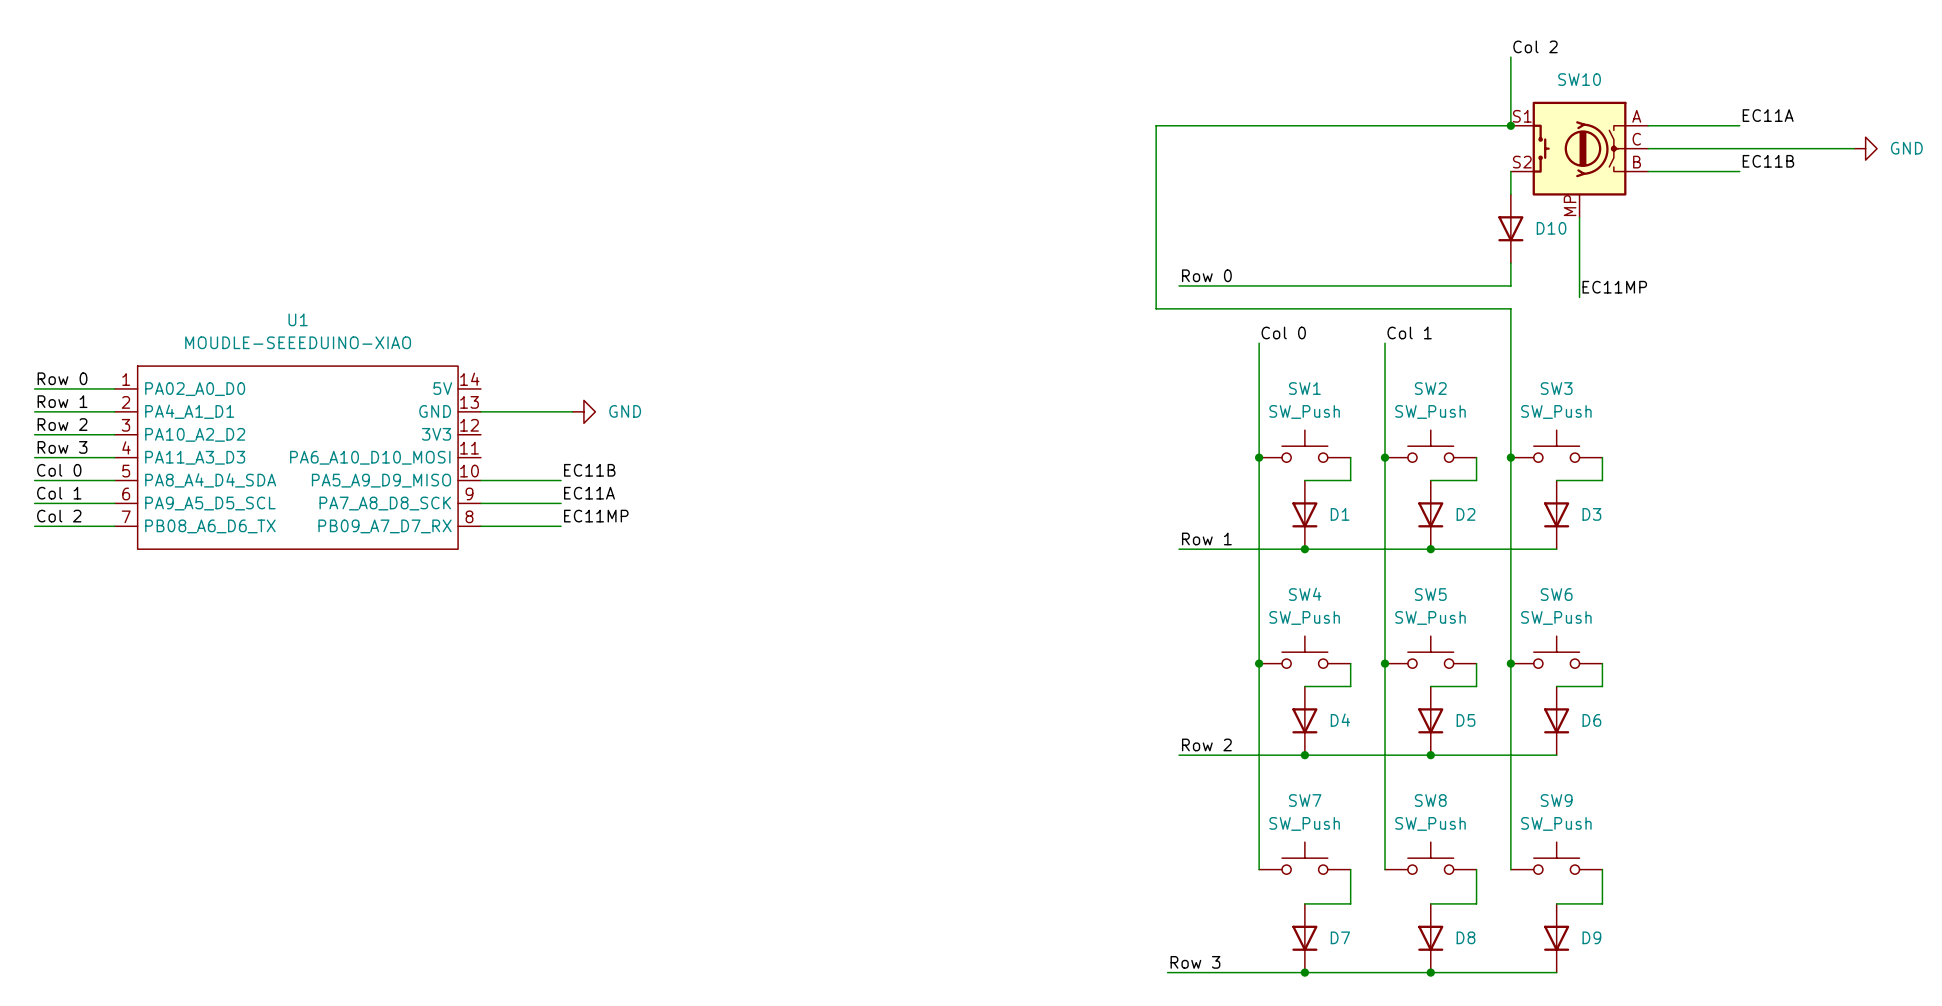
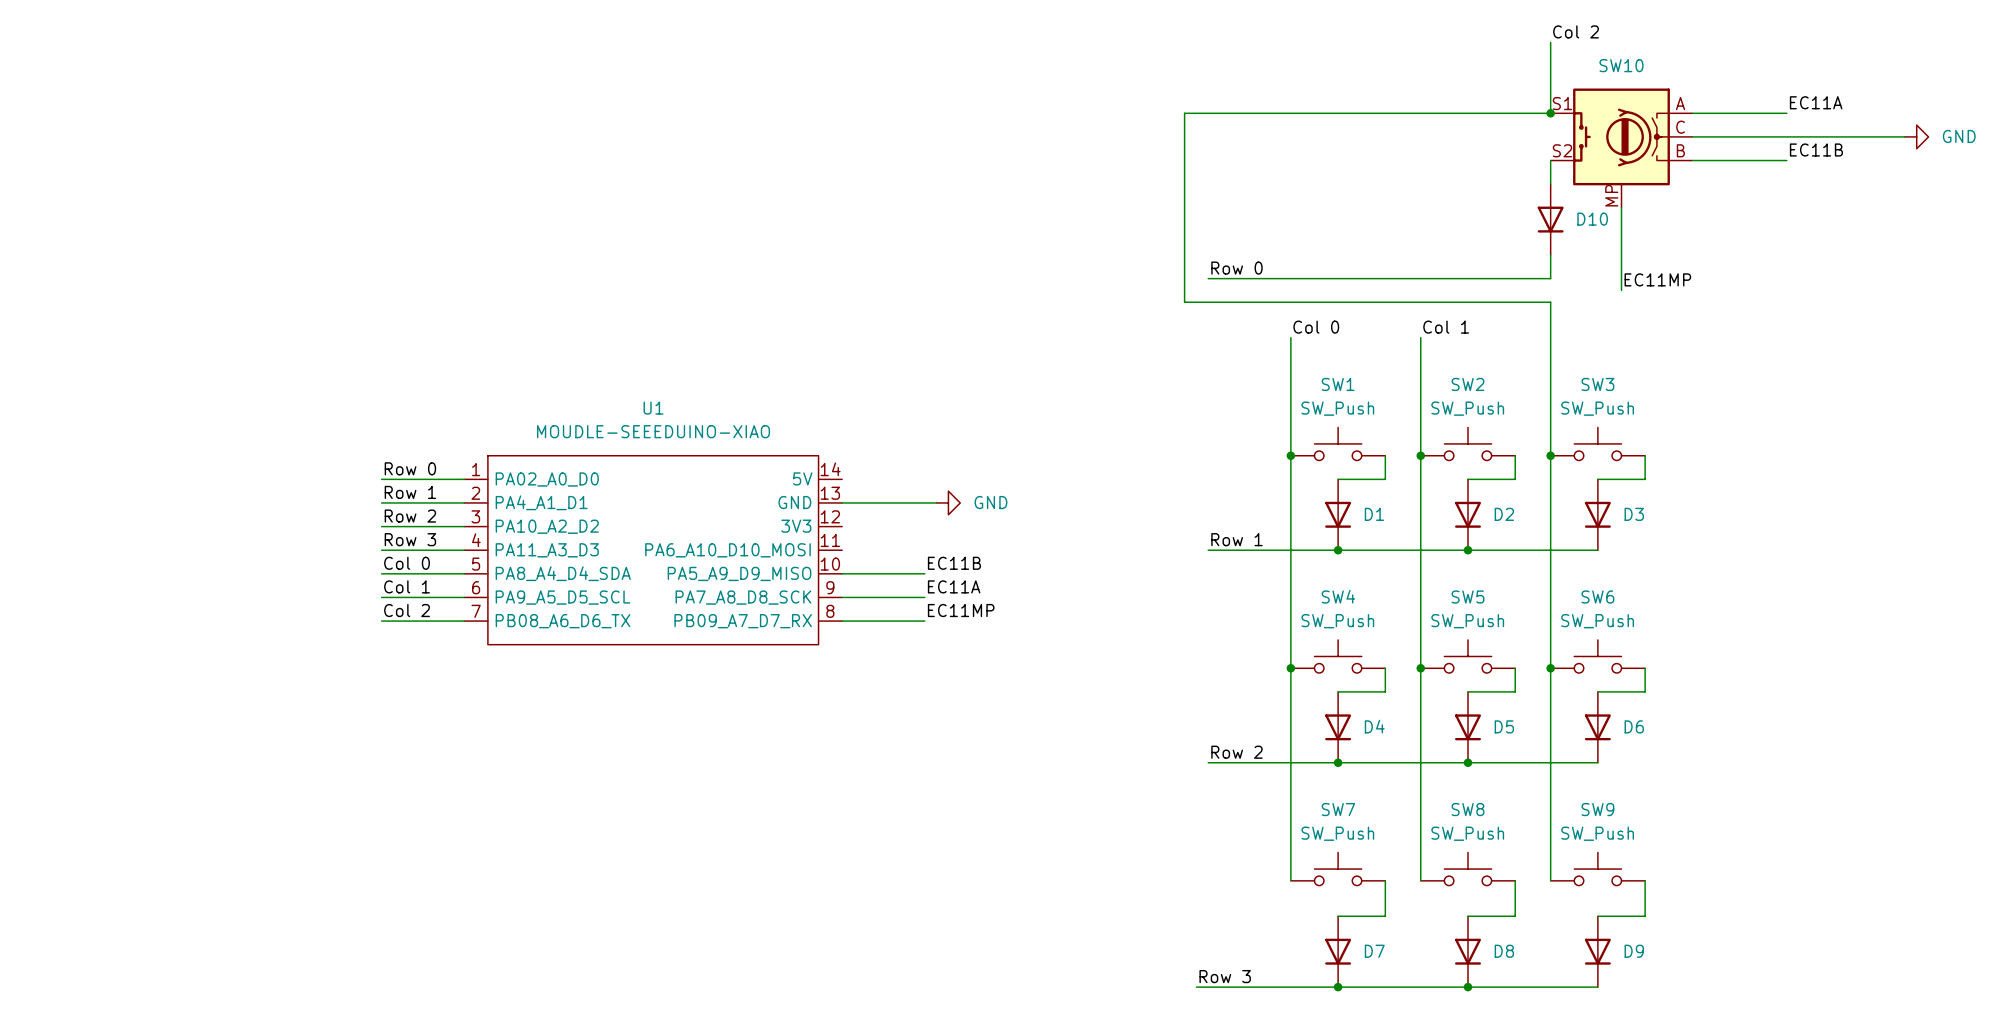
label: Row 0 (62, 378) -> none
wire: (34, 388) (114, 388) -> none
label: Row 1 (62, 401) -> none
wire: (34, 411) (114, 411) -> none
wire: (480, 411) (572, 411) -> none
power symbol: GND (583, 411) -> none
label: Row 2 (62, 424) -> none
wire: (34, 434) (114, 434) -> none
label: Row 3 (62, 447) -> none
wire: (34, 457) (114, 457) -> none
U1 position: (297, 457) -> (653, 550)
label: Col 0 (59, 470) -> none
label: none -> Row 0 (410, 468)
label: EC11B (589, 470) -> none
wire: (34, 480) (114, 480) -> none
wire: (480, 480) (561, 480) -> (381, 479) (464, 479)
label: Col 1 (59, 493) -> none
label: none -> Row 1 (410, 492)
label: EC11A (589, 493) -> none
wire: (34, 503) (114, 503) -> none
wire: (480, 503) (561, 503) -> (381, 502) (464, 502)
wire: none -> (842, 502) (936, 502)
power symbol: none -> GND (948, 502)
label: Col 2 (59, 516) -> none
label: none -> Row 2 (410, 516)
label: EC11MP (596, 516) -> none
wire: (34, 526) (114, 526) -> none
wire: (480, 526) (561, 526) -> (381, 526) (464, 526)
label: none -> Row 3 (410, 539)
label: none -> Col 0 (407, 563)
label: none -> EC11B (954, 563)
wire: none -> (381, 573) (464, 573)
wire: none -> (842, 573) (924, 573)
label: none -> Col 1 (407, 586)
label: none -> EC11A (954, 586)
wire: none -> (381, 597) (464, 597)
wire: none -> (842, 597) (924, 597)
label: none -> Col 2 (407, 610)
label: none -> EC11MP (961, 610)
wire: none -> (381, 621) (464, 621)
wire: none -> (842, 621) (924, 621)

